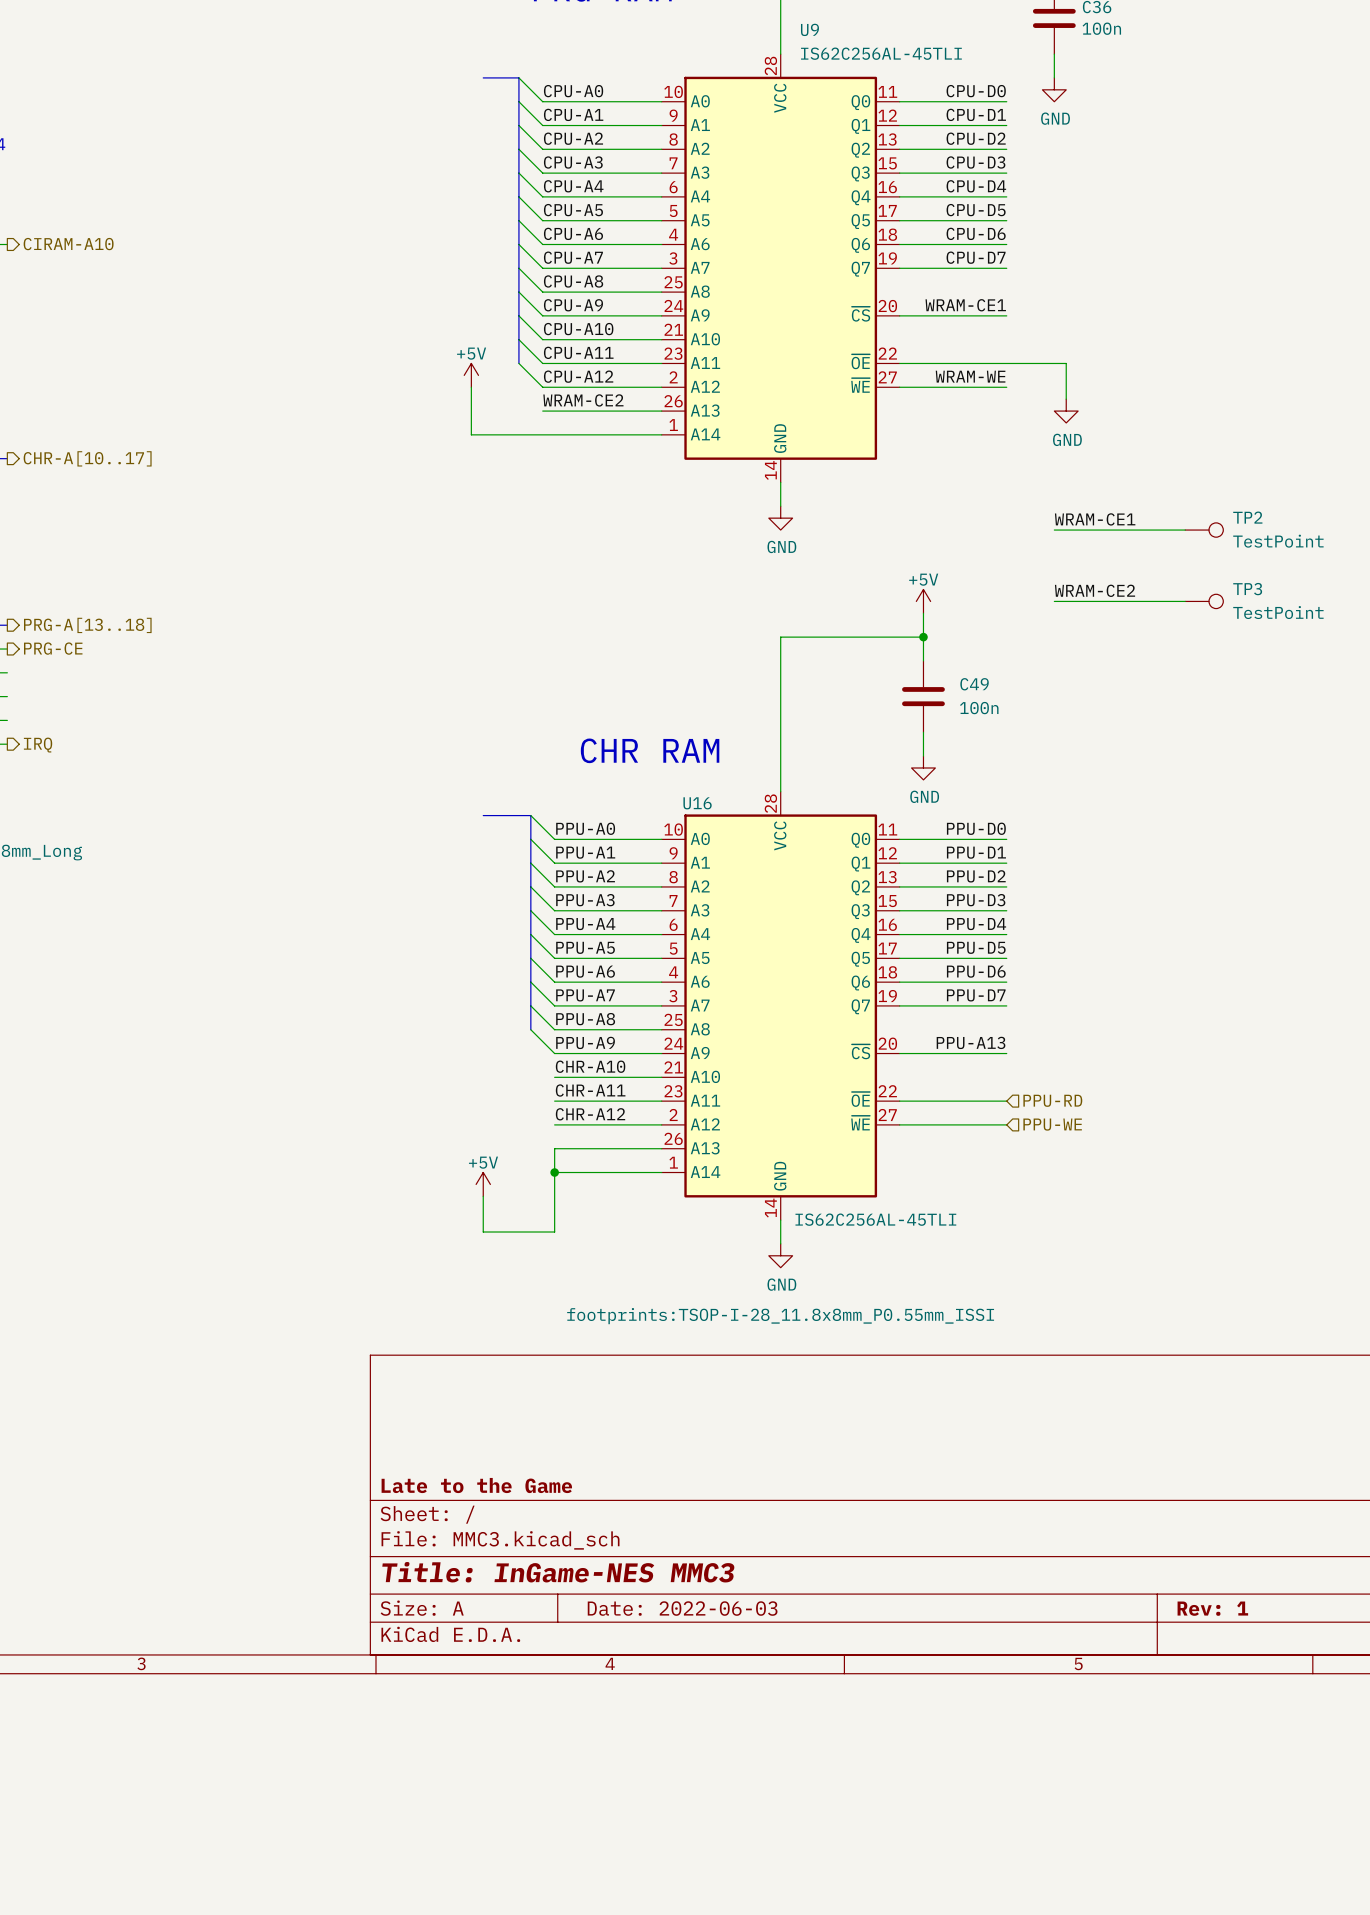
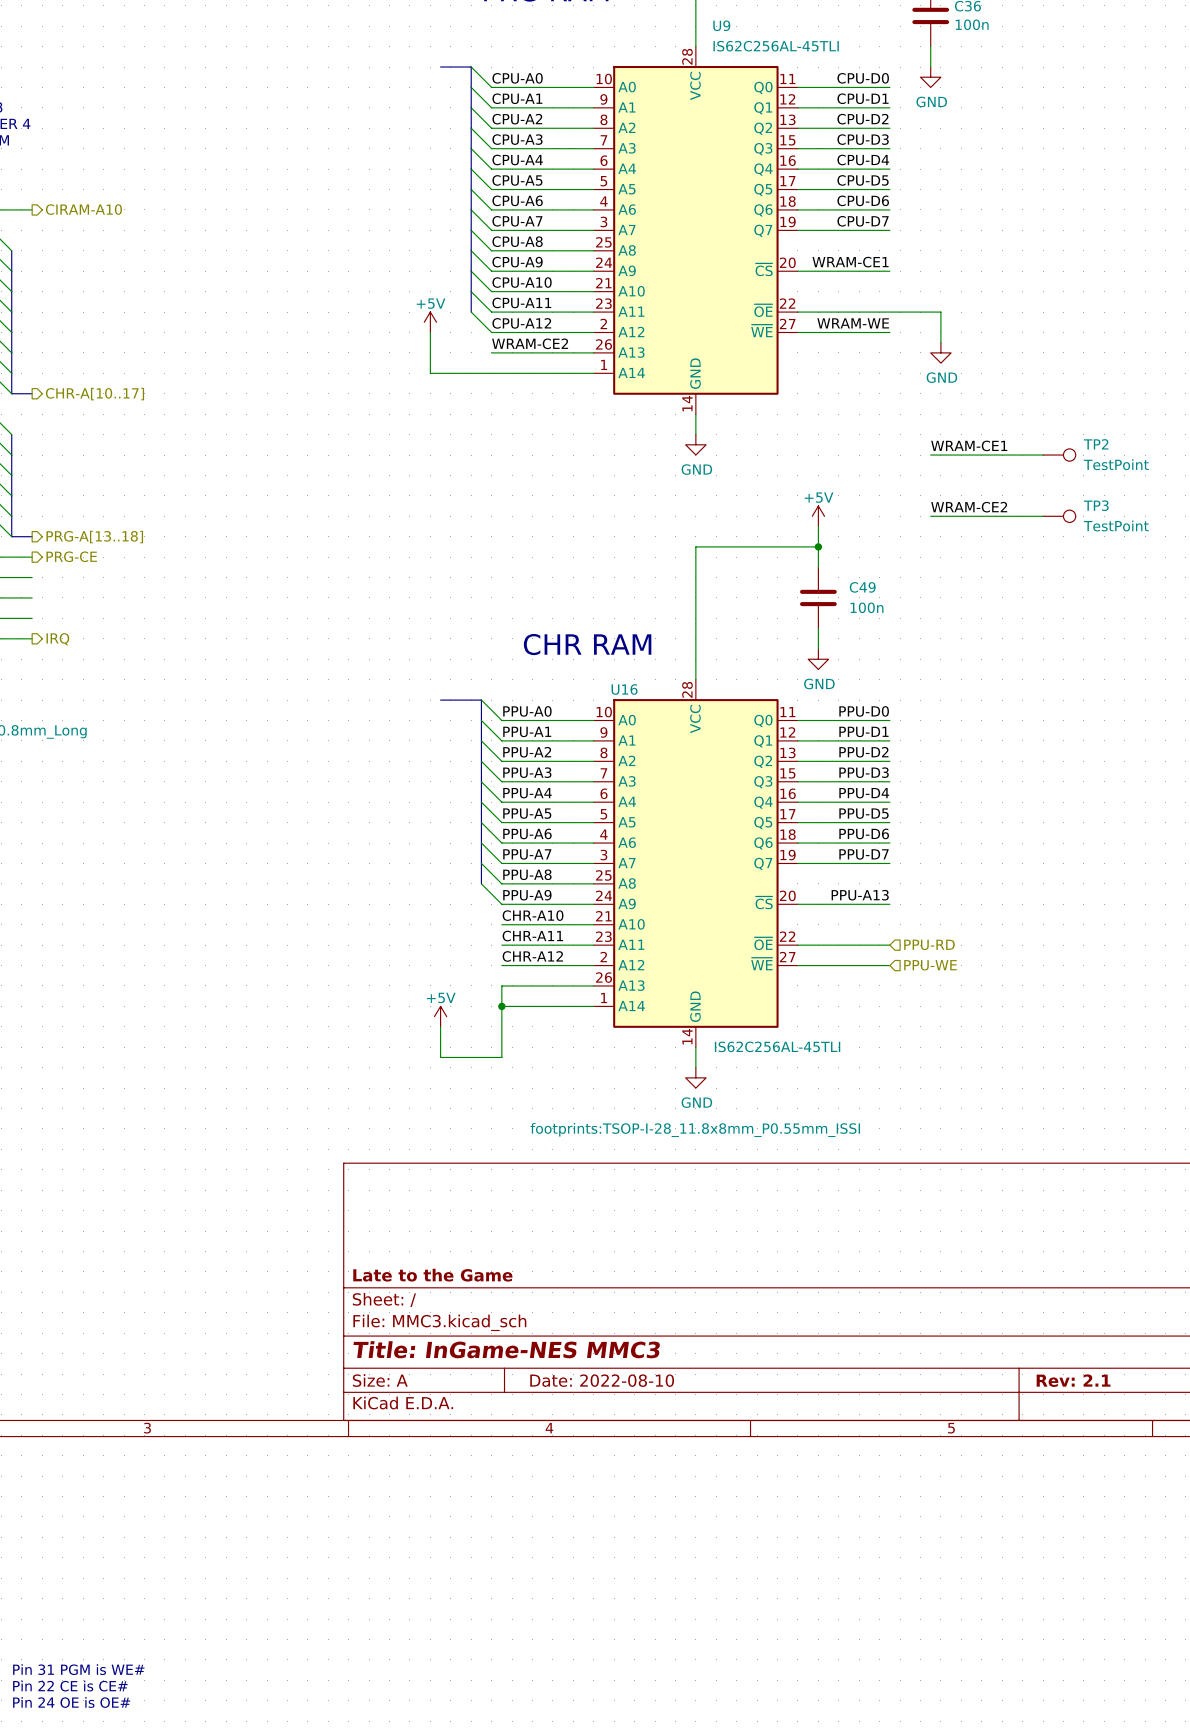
title block: Date: 2022-06-03 (682, 1608) -> Date: 2022-08-10 (602, 1380)
title block: Rev: 1 (1212, 1608) -> Rev: 2.1 (1073, 1380)

